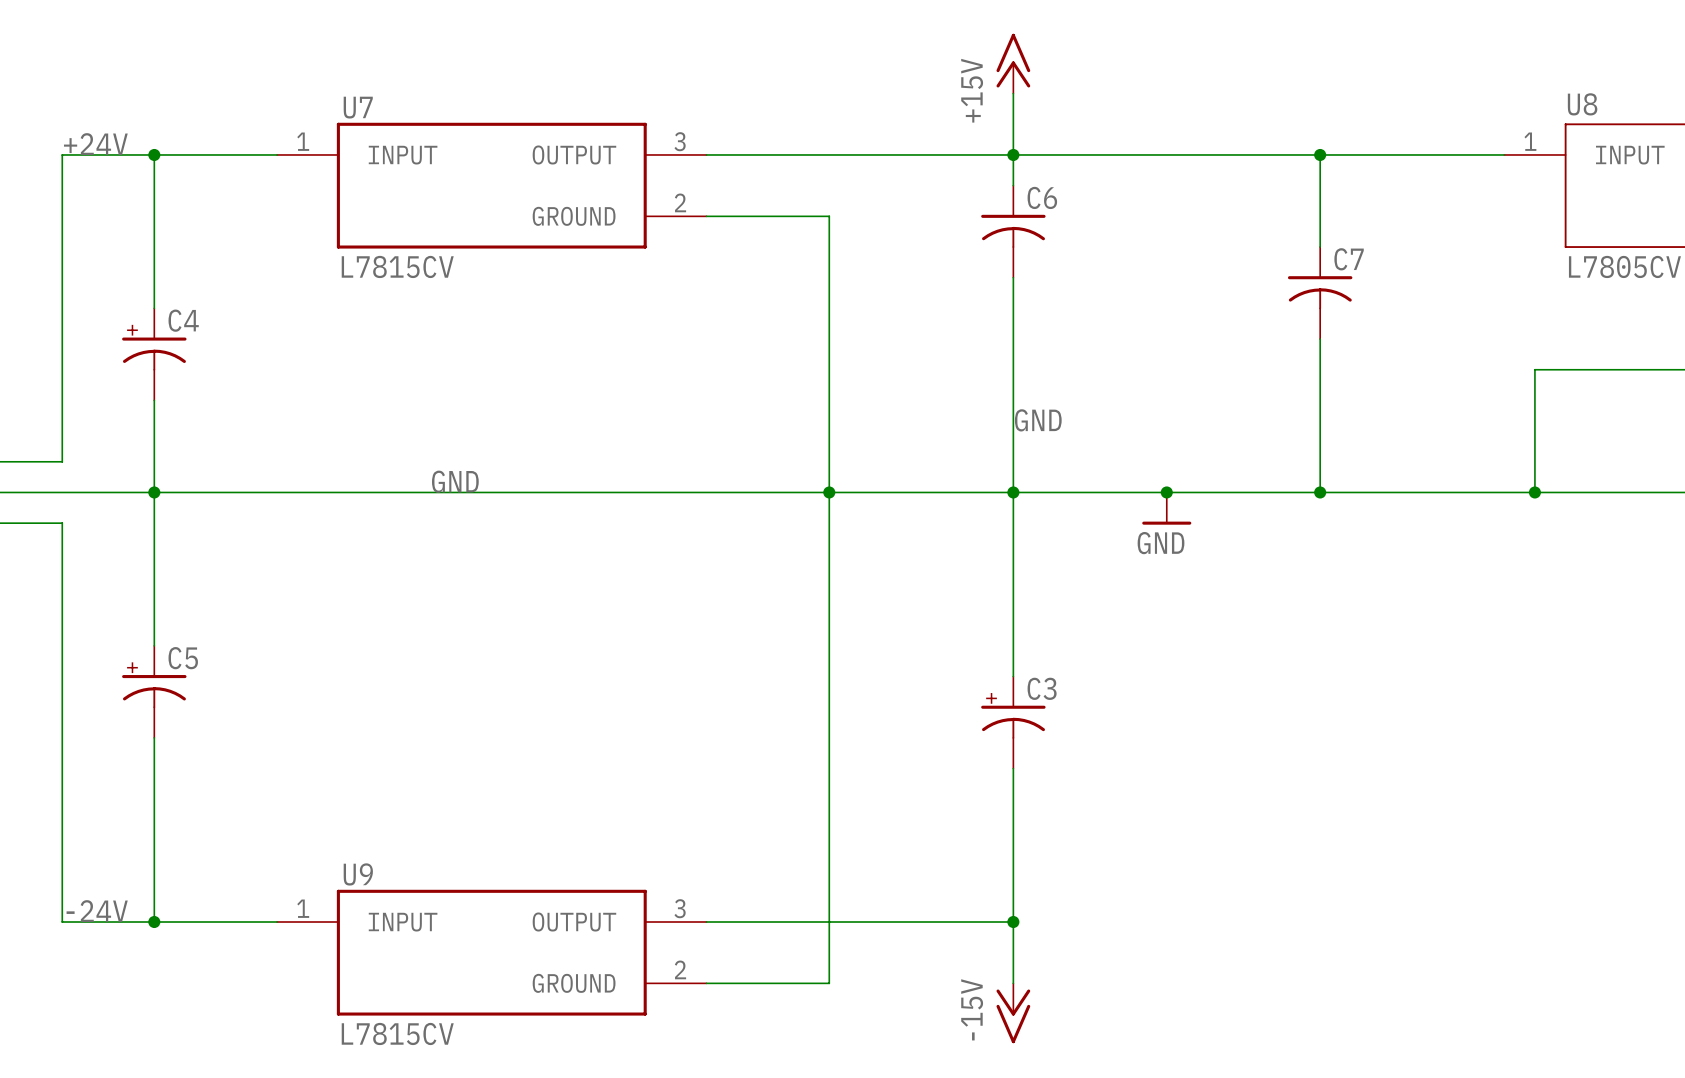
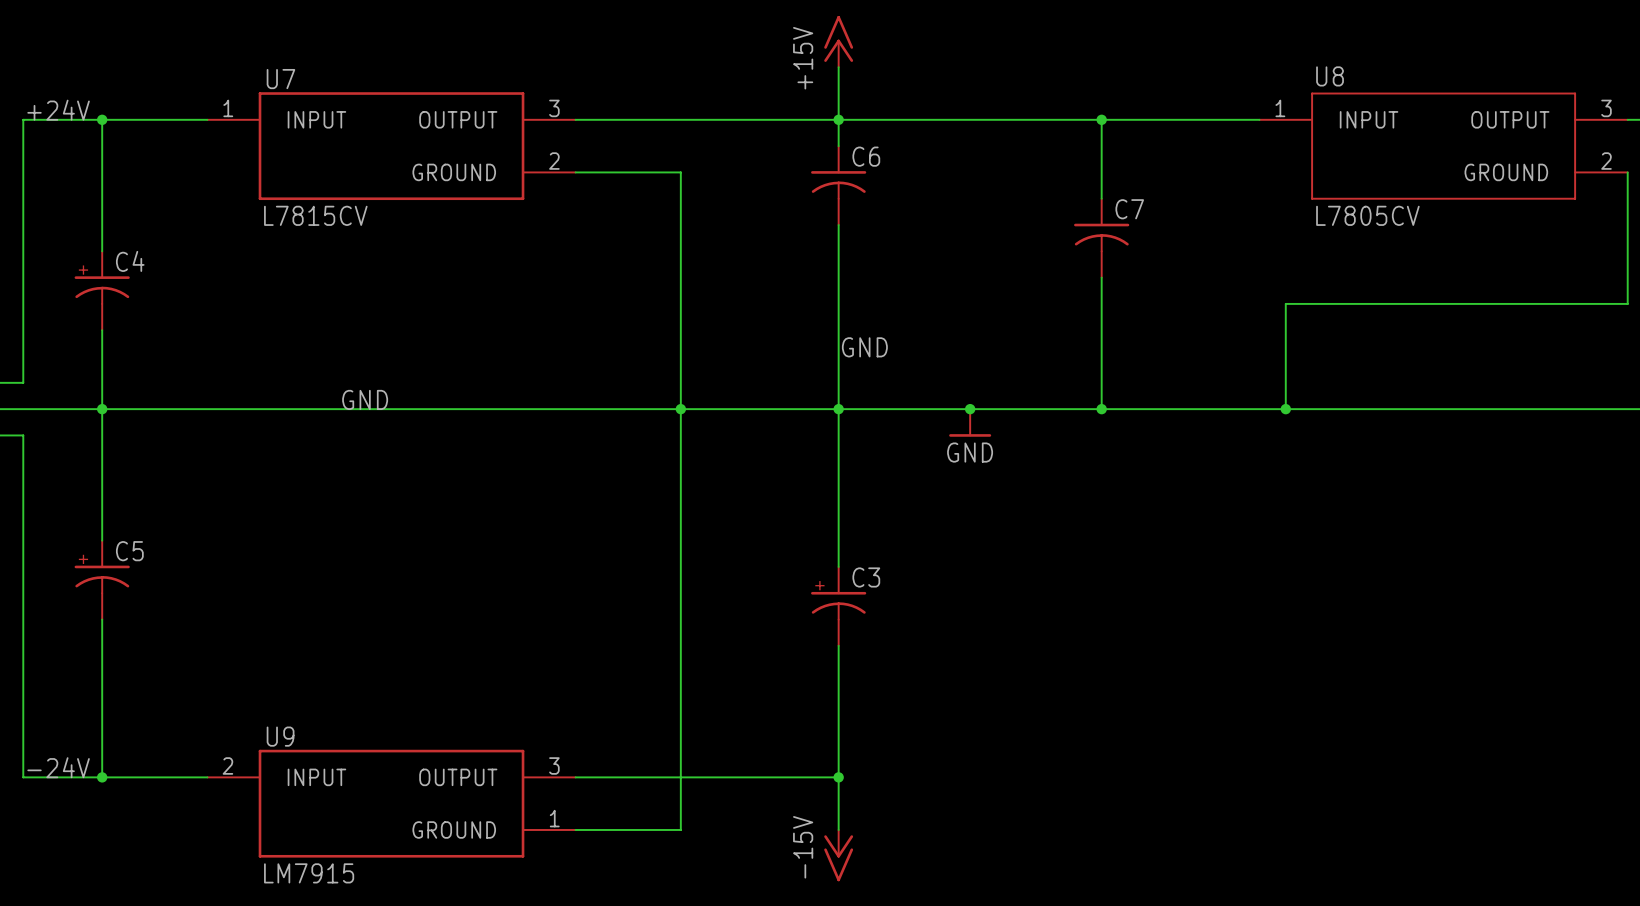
U9 pin number: 1 (303, 908) -> 2 (227, 765)
U9 pin number: 2 (680, 969) -> 1 (554, 818)
U9 value: L7815CV (397, 1033) -> LM7915 (309, 873)

